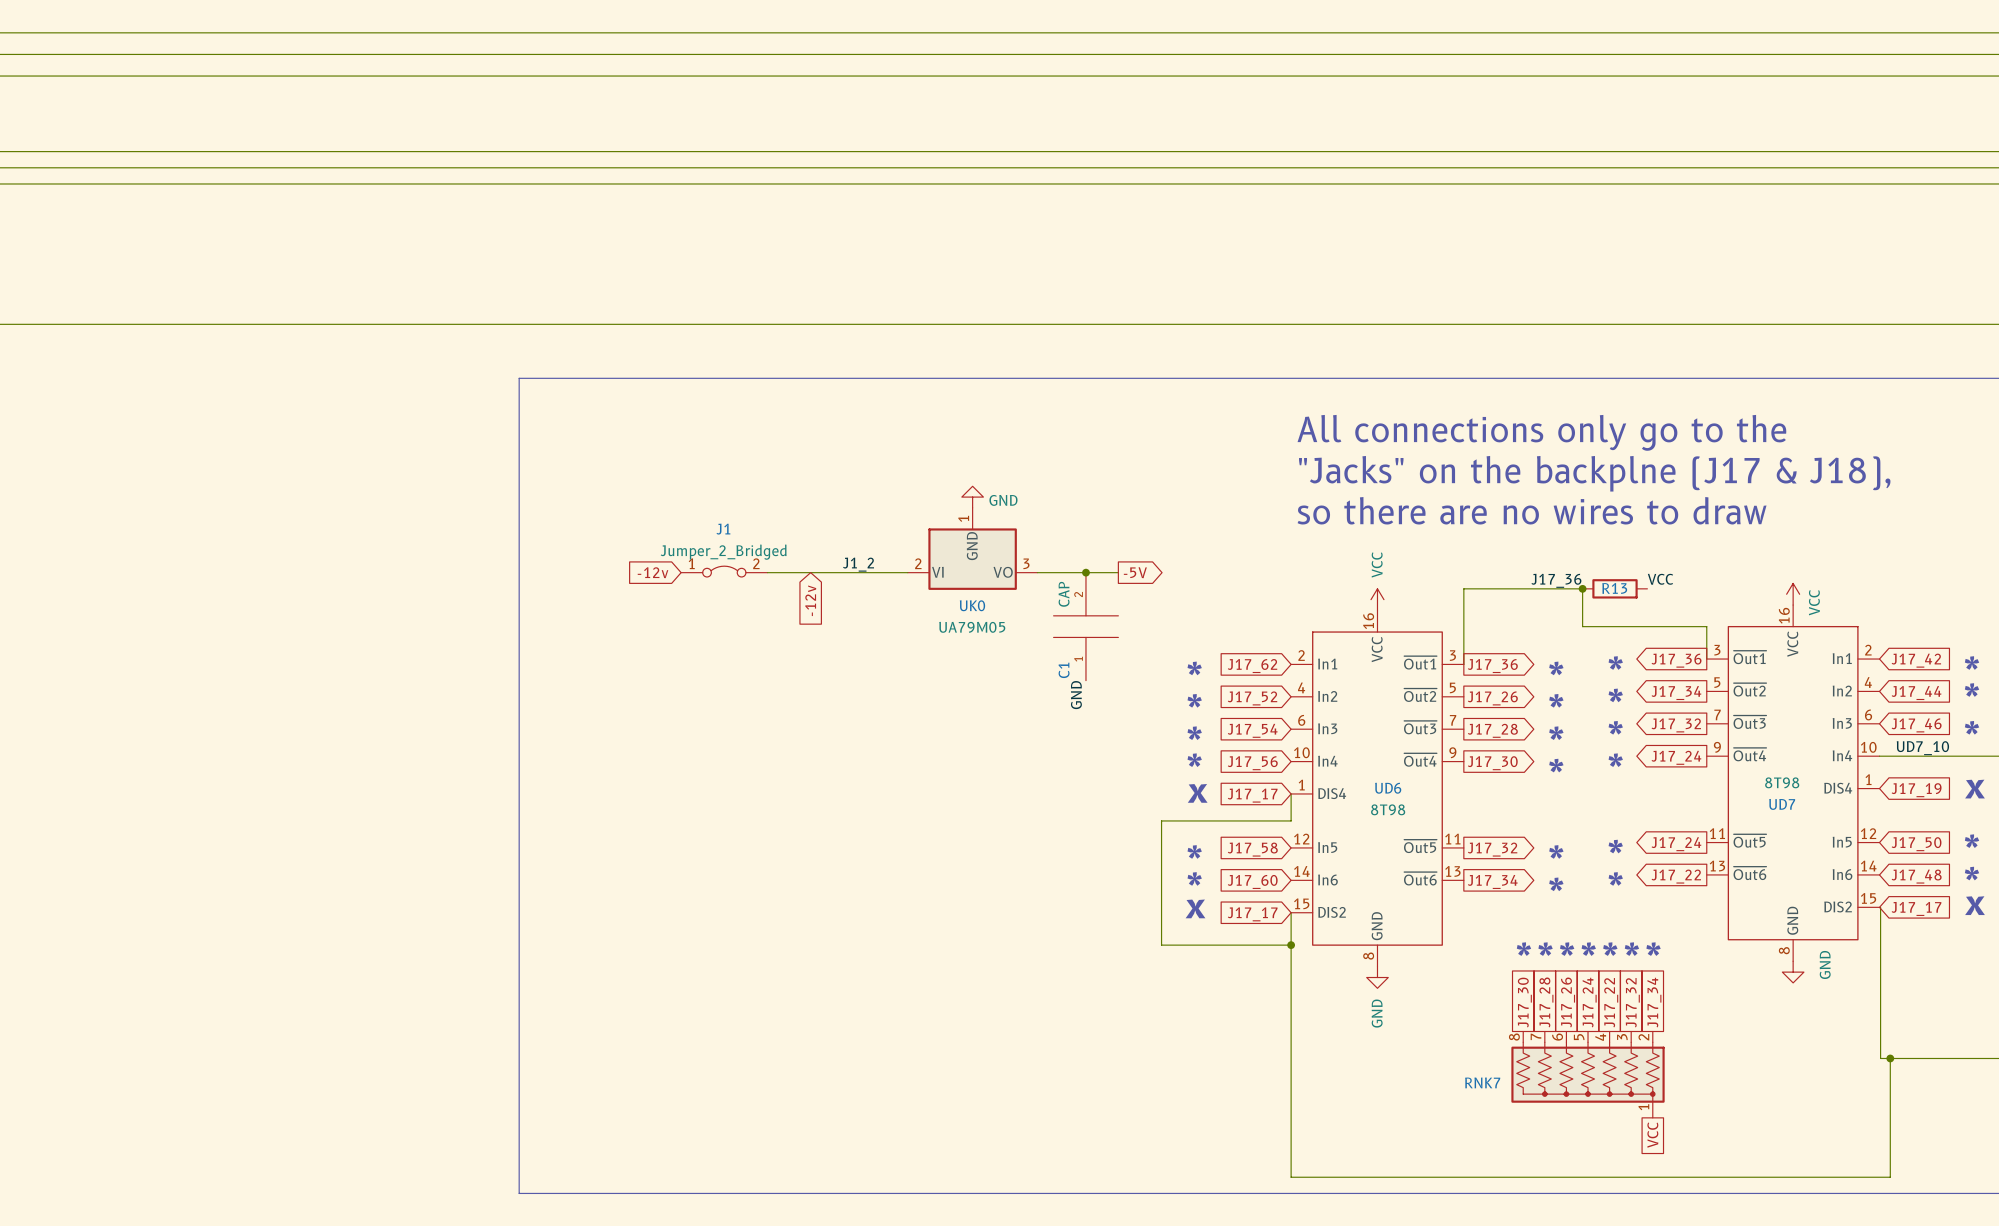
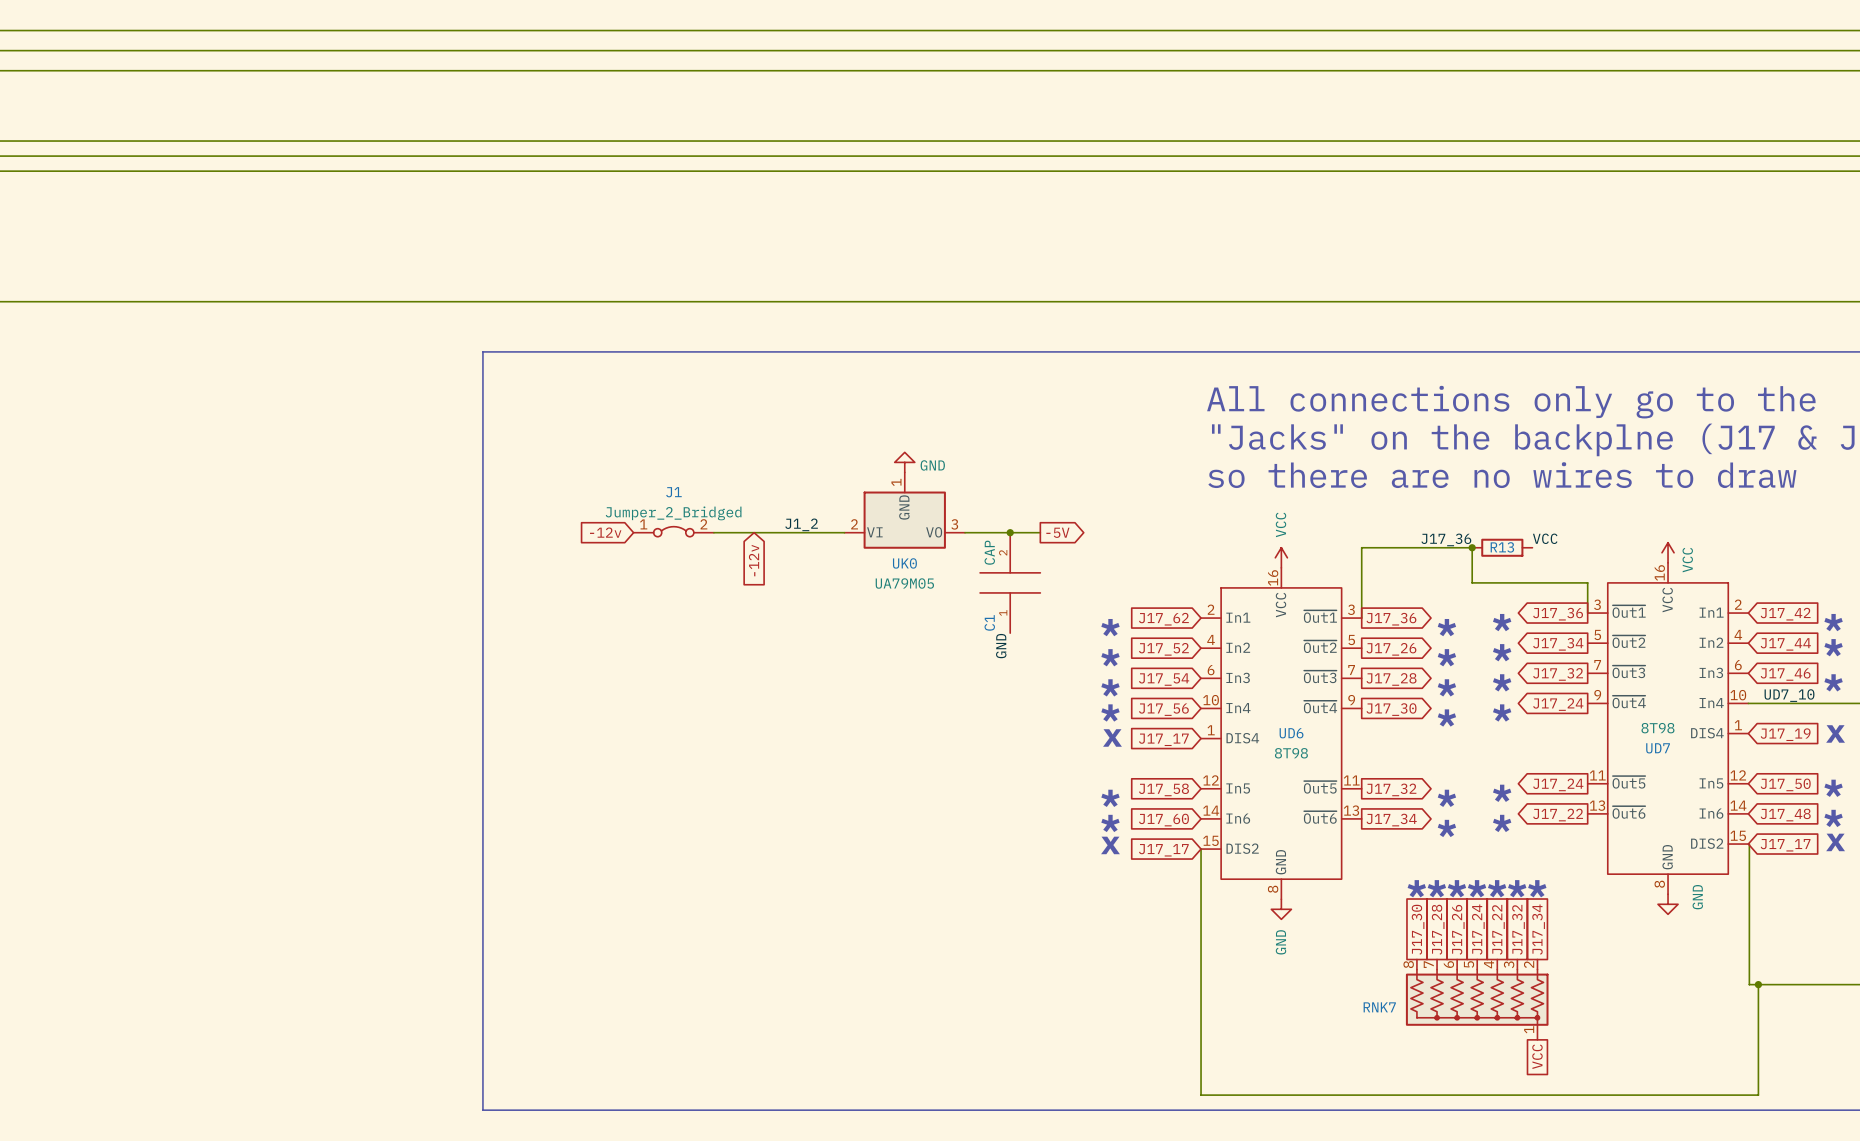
wire: (1291, 793) (1291, 820) (1161, 820) (1161, 945) (1291, 945) -> none
junction: (1291, 945) -> none

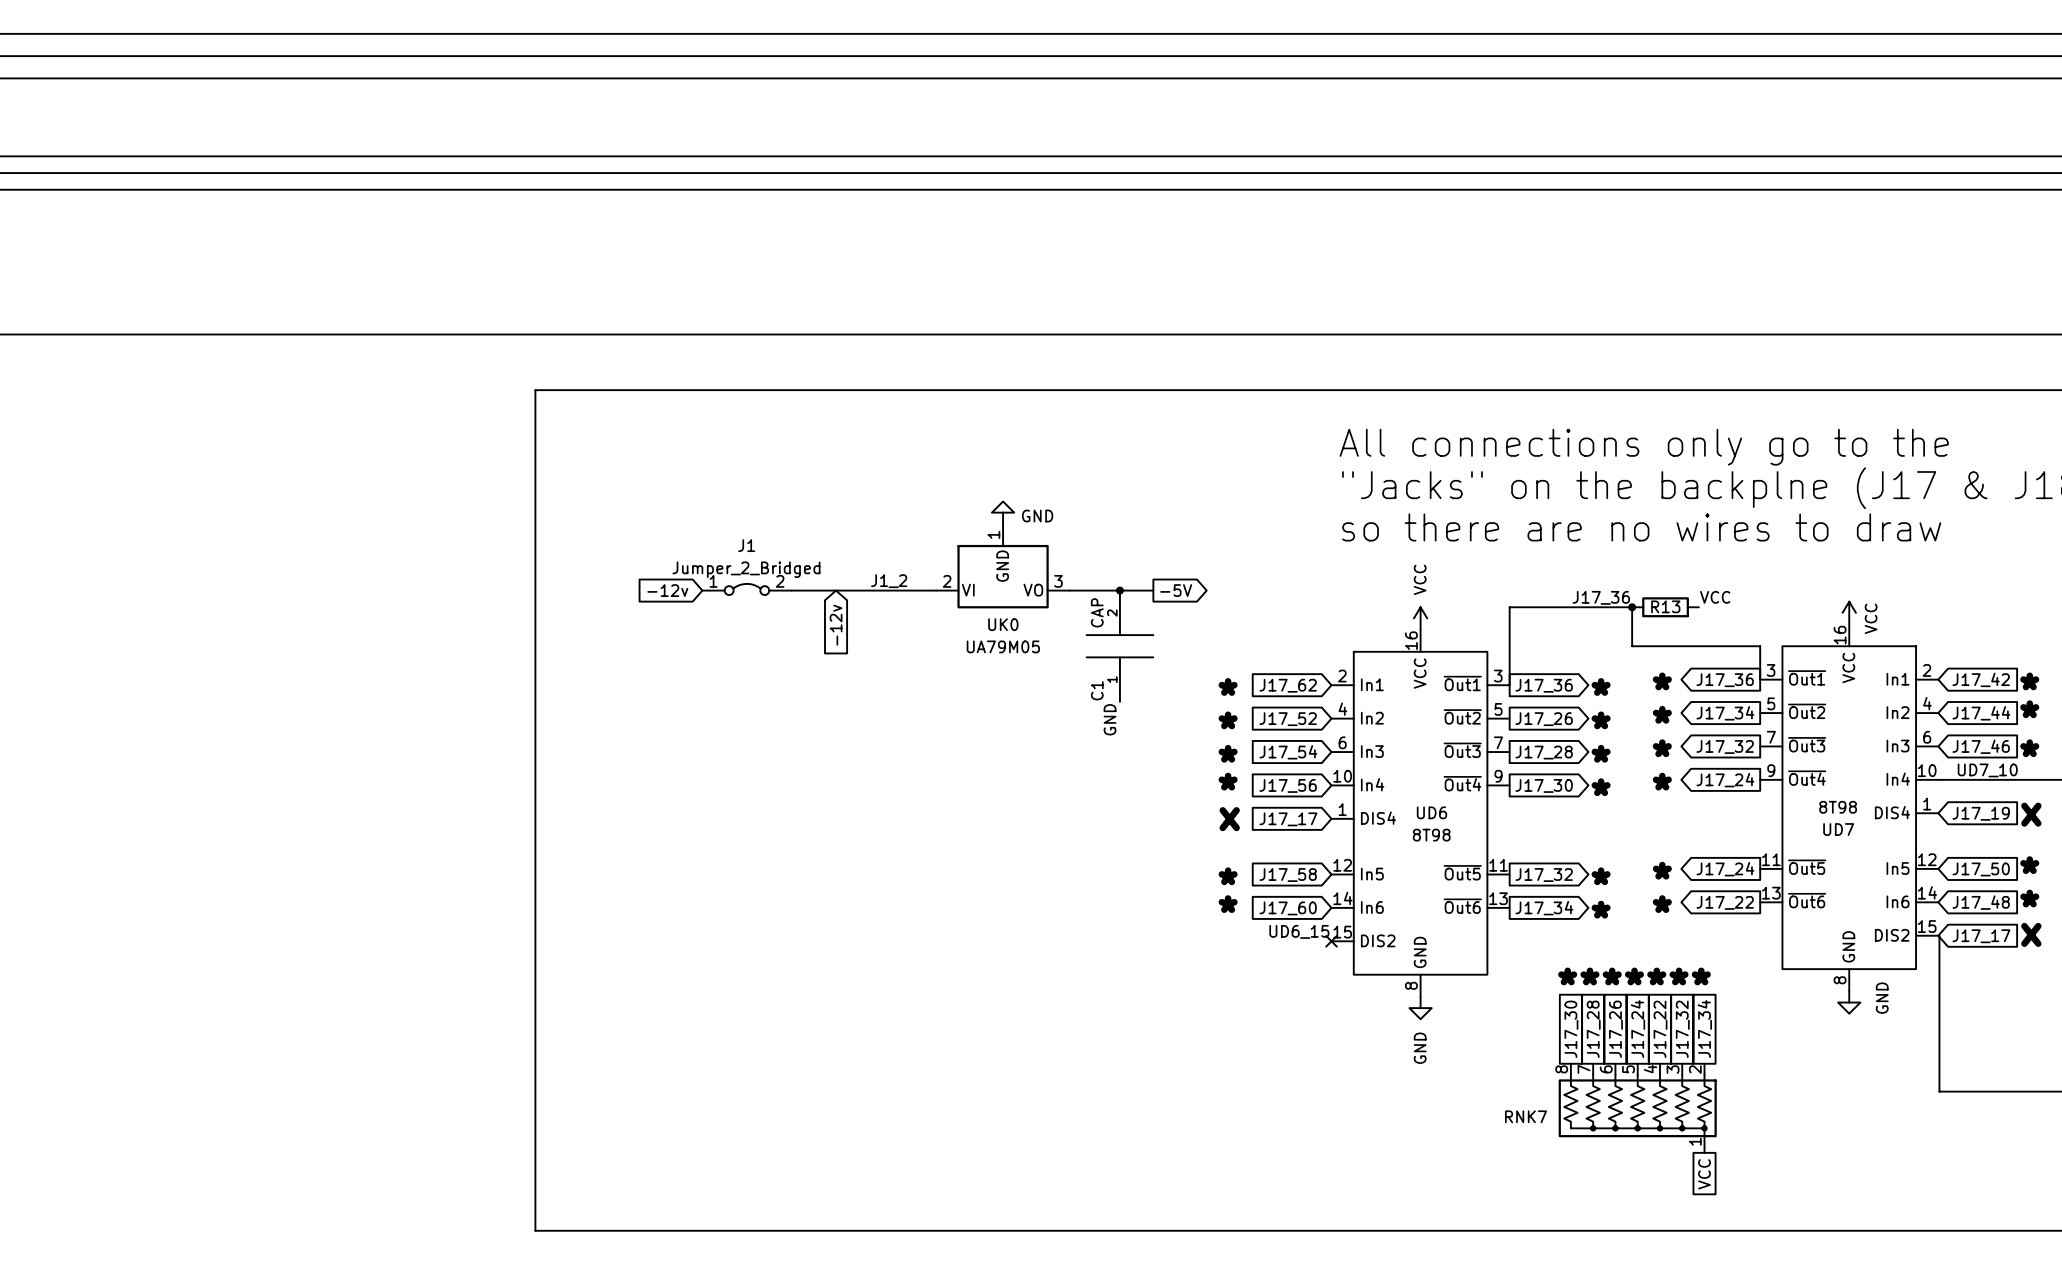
label: none -> UD6_15 (1299, 931)
text: x (1110, 845) -> none
wire: (1201, 849) (1201, 1095) (1758, 1095) (1758, 984) -> none
no-connect mark: none -> (1331, 941)
global label: J17_17 (1163, 850) -> none
junction: (1758, 984) -> none

